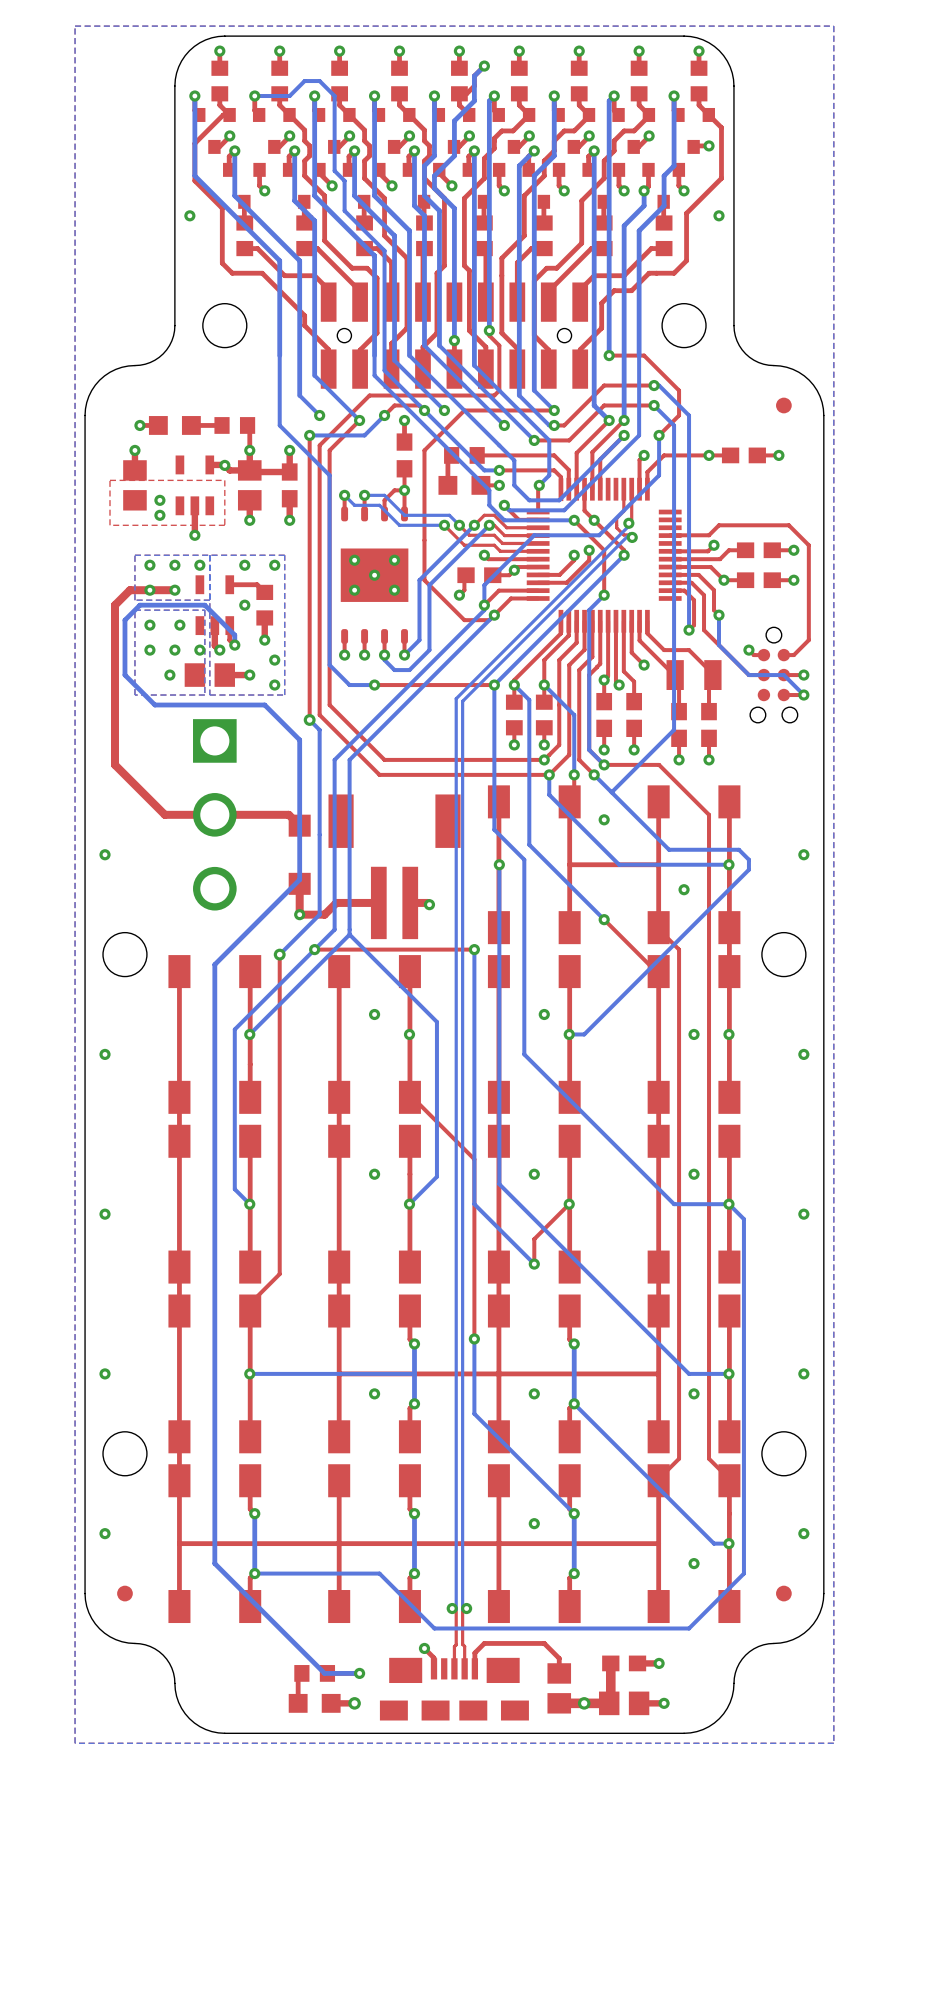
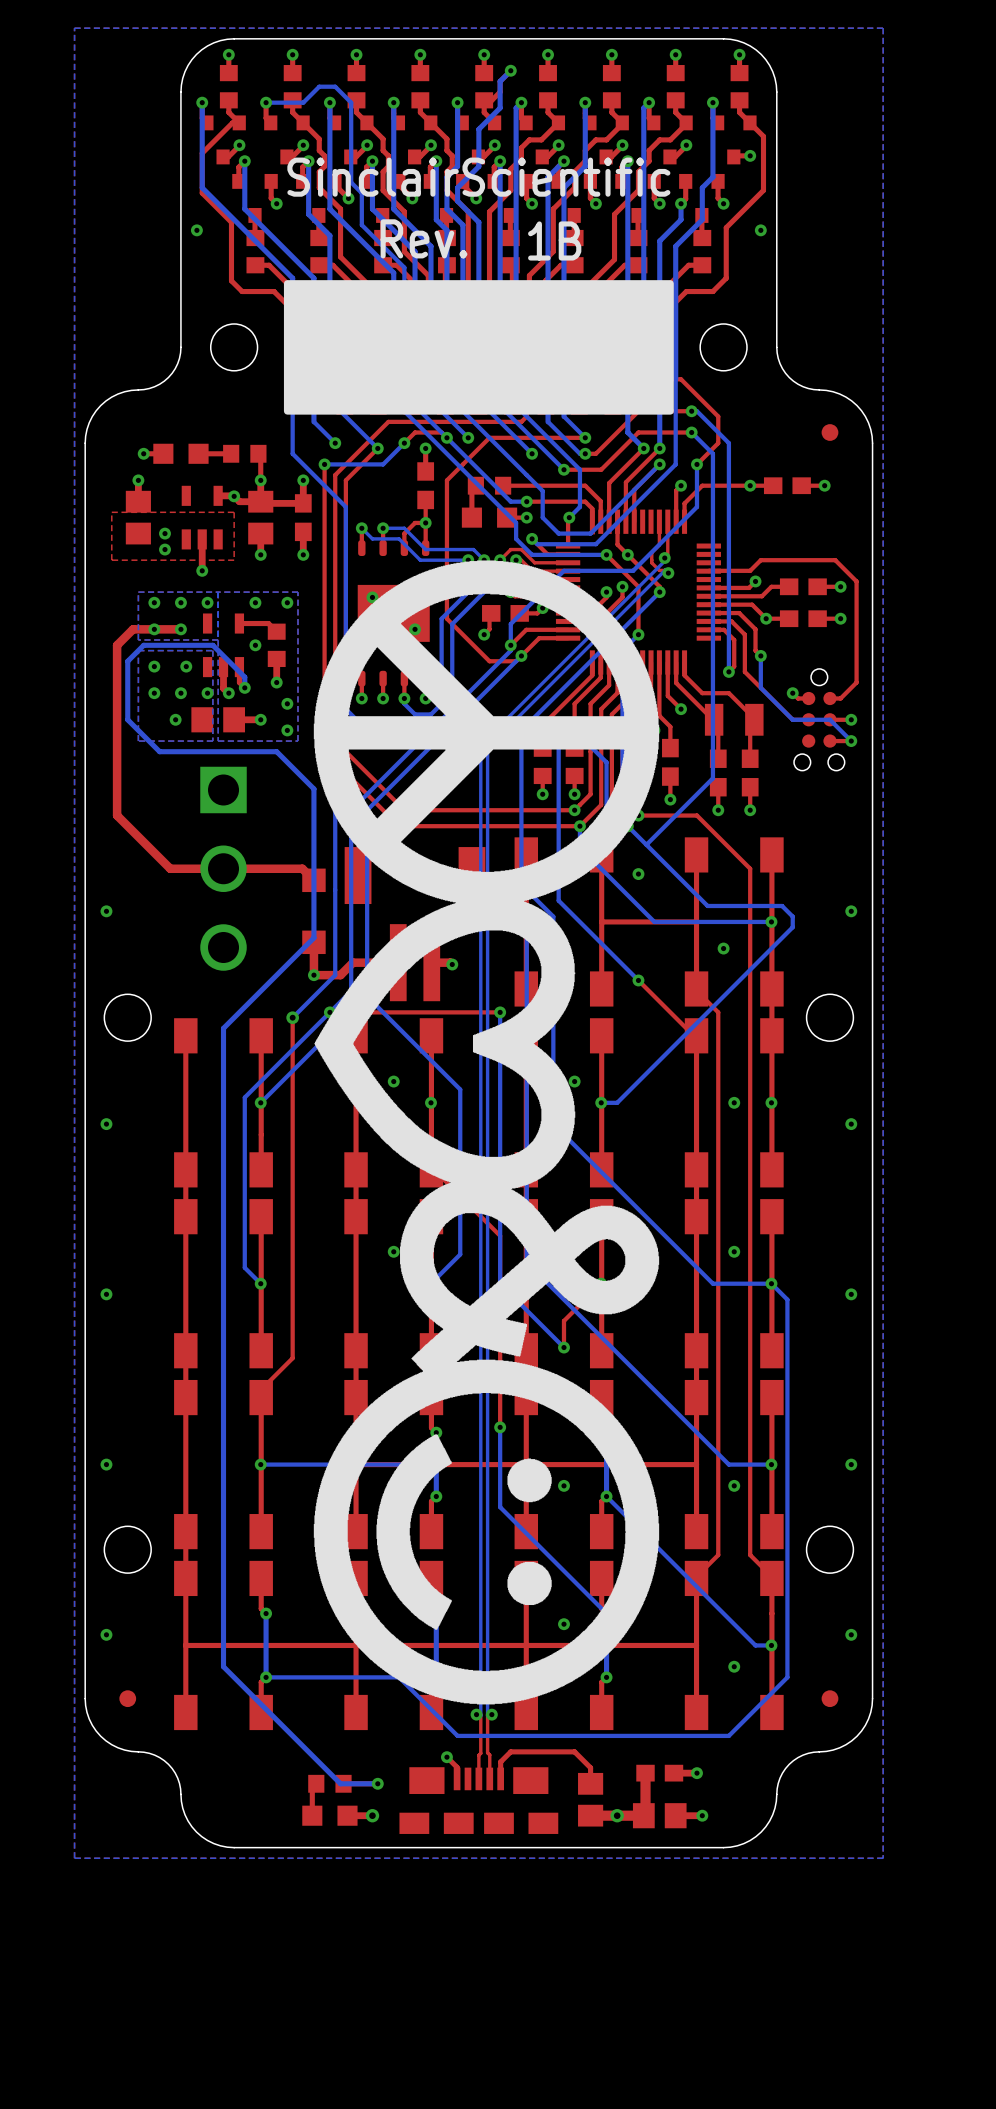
drawing: none -> [283, 280, 674, 415]
drawing: none -> [313, 560, 660, 1705]

